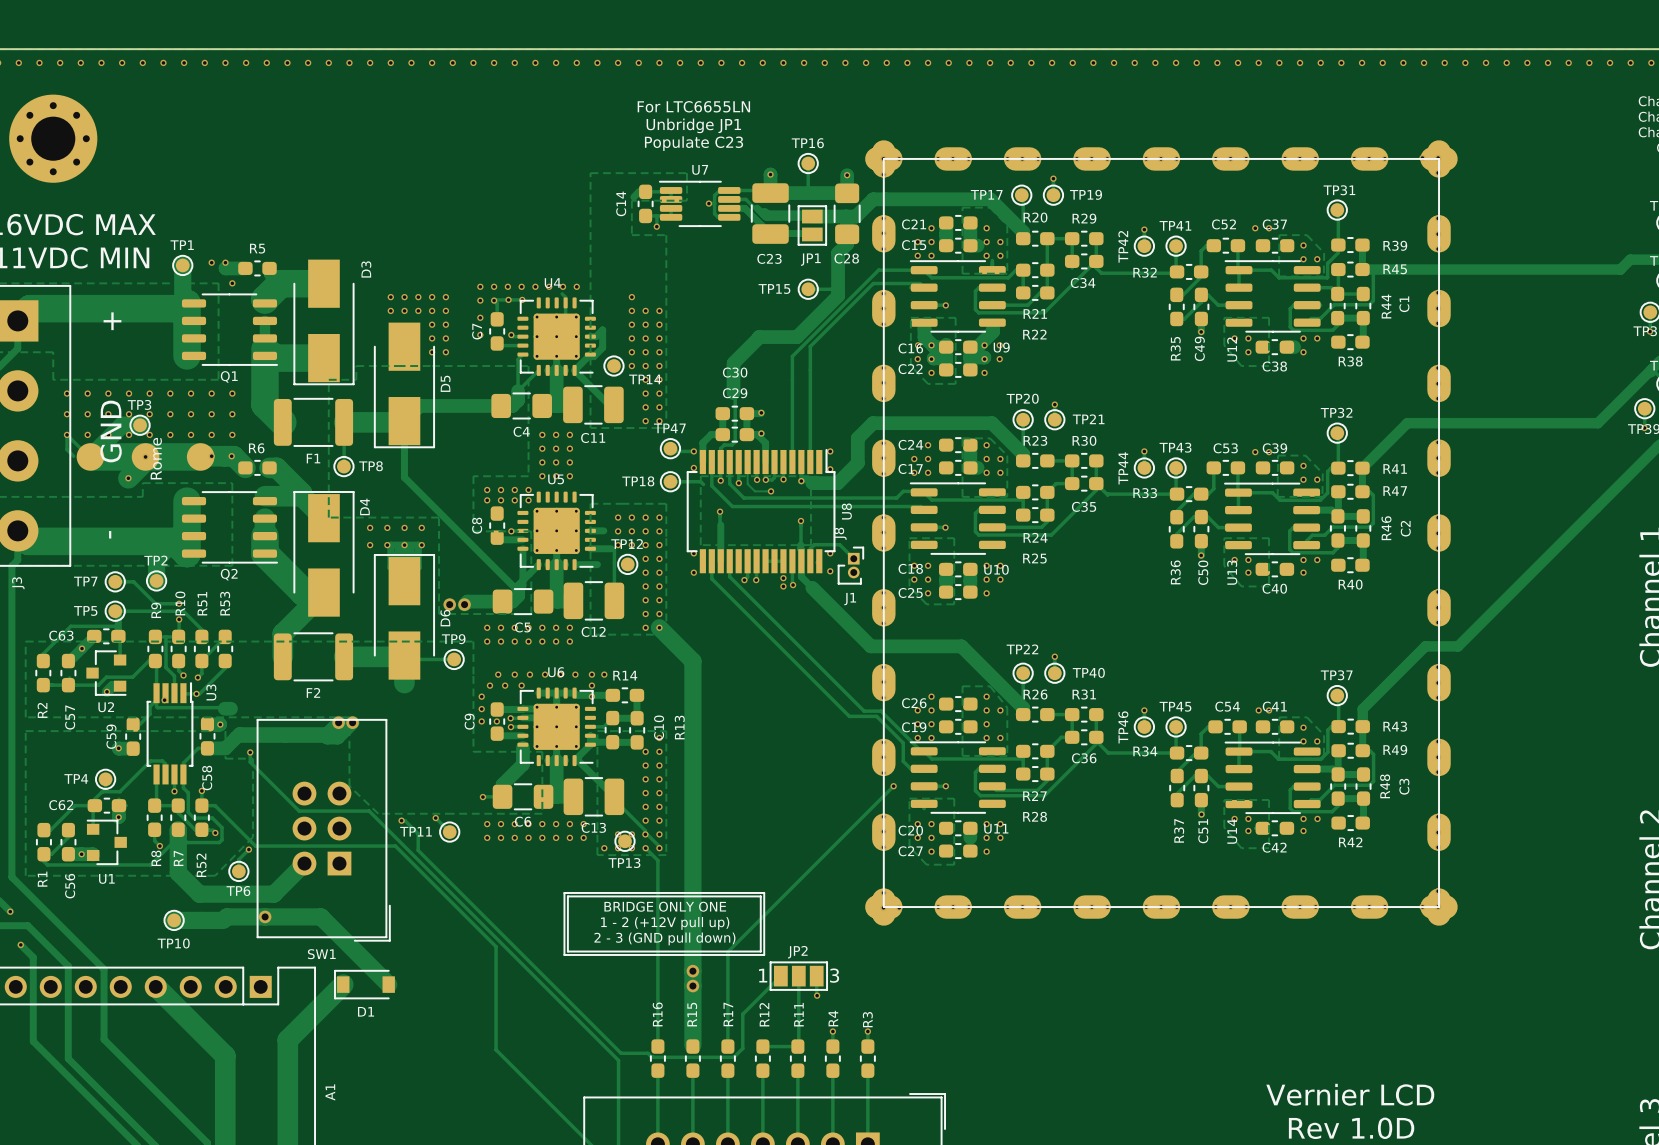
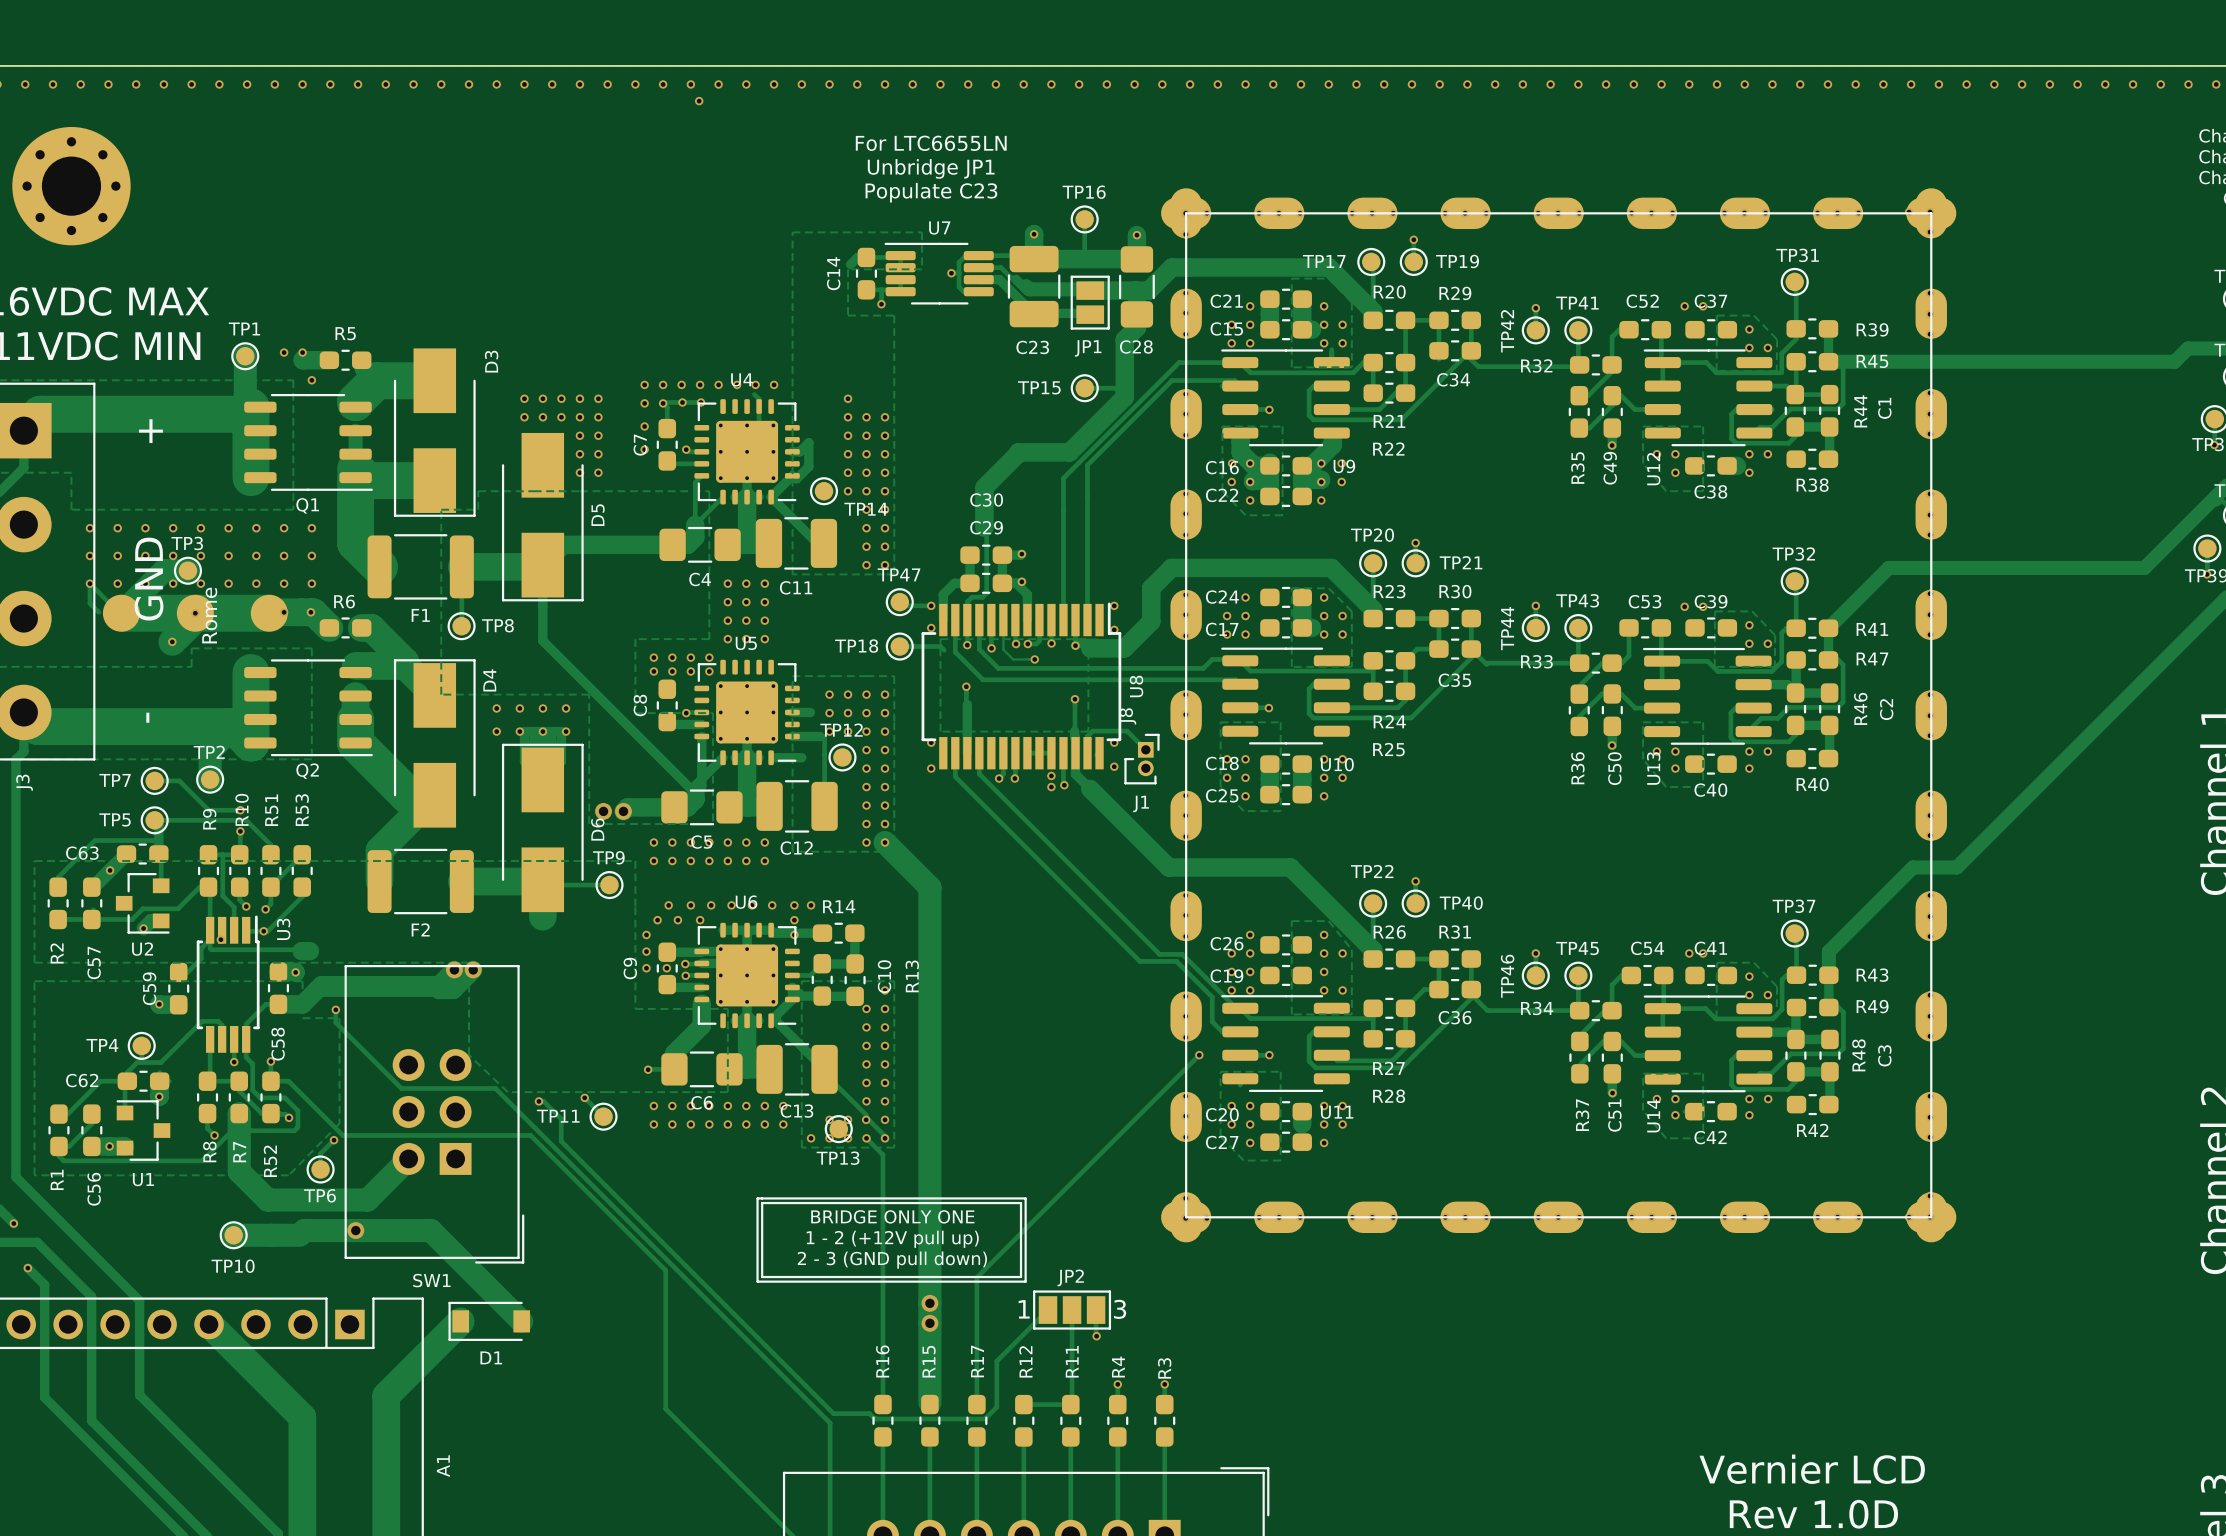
via: none -> (699, 101)

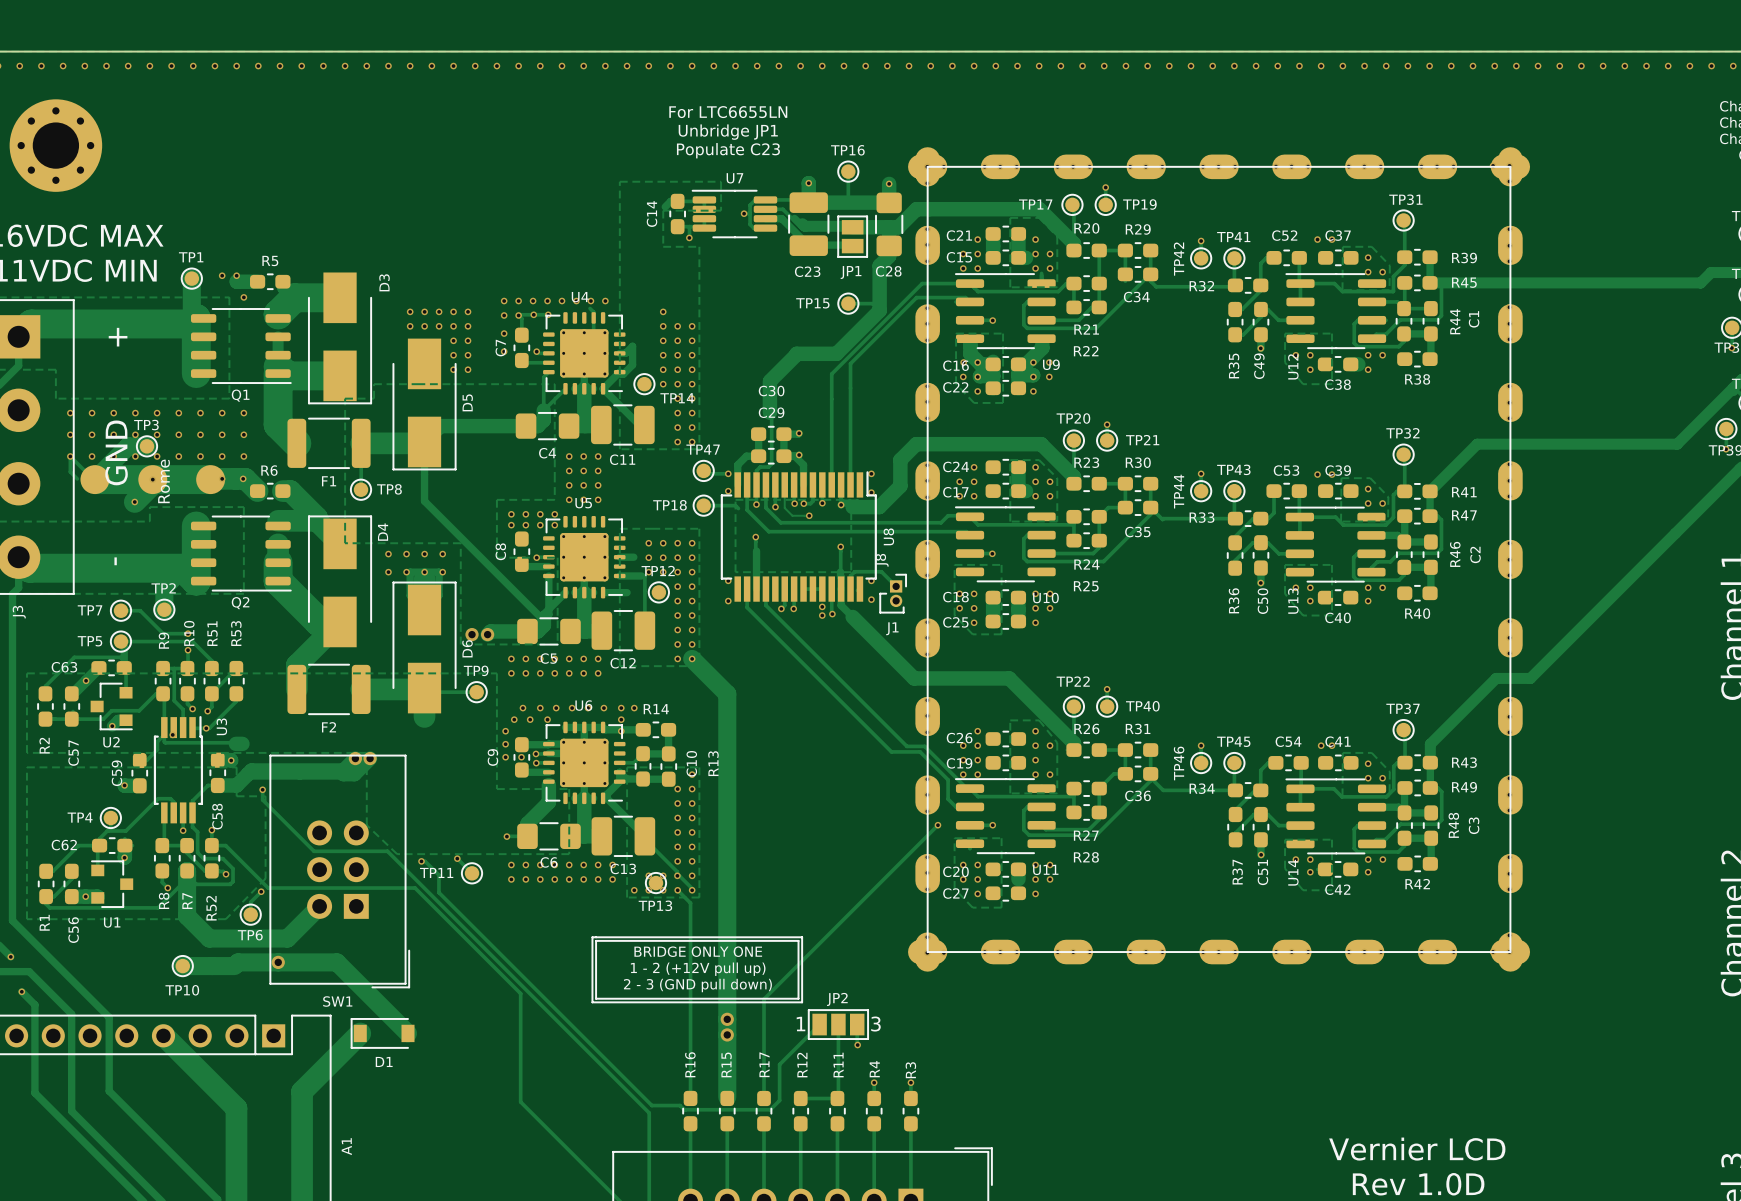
via: (699, 101) -> none

